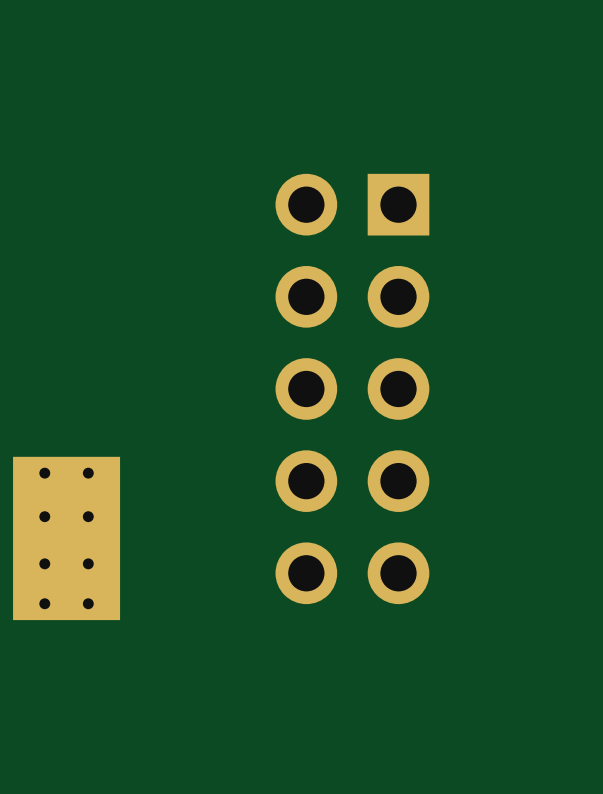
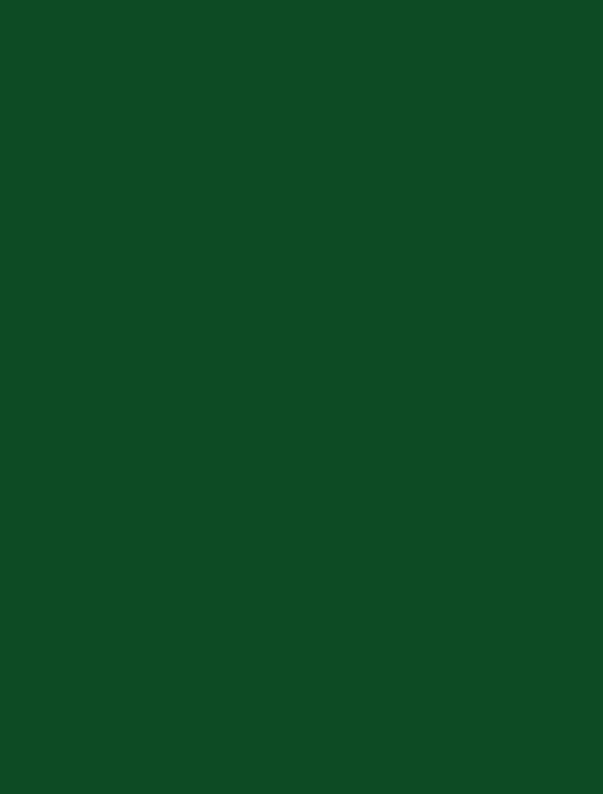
part: (352, 388) -> none
part: (66, 538) -> none

